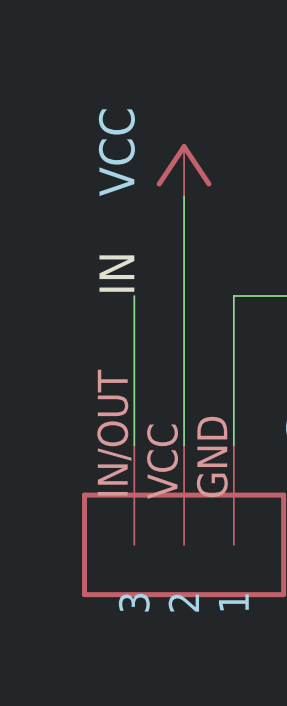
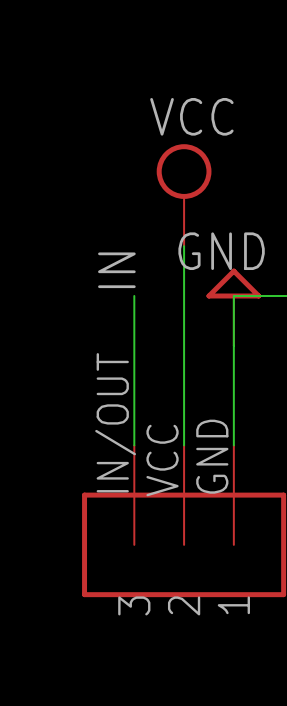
power symbol: VCC (184, 170) -> none
power symbol: none -> VCC (184, 195)
power symbol: none -> GND (233, 307)

